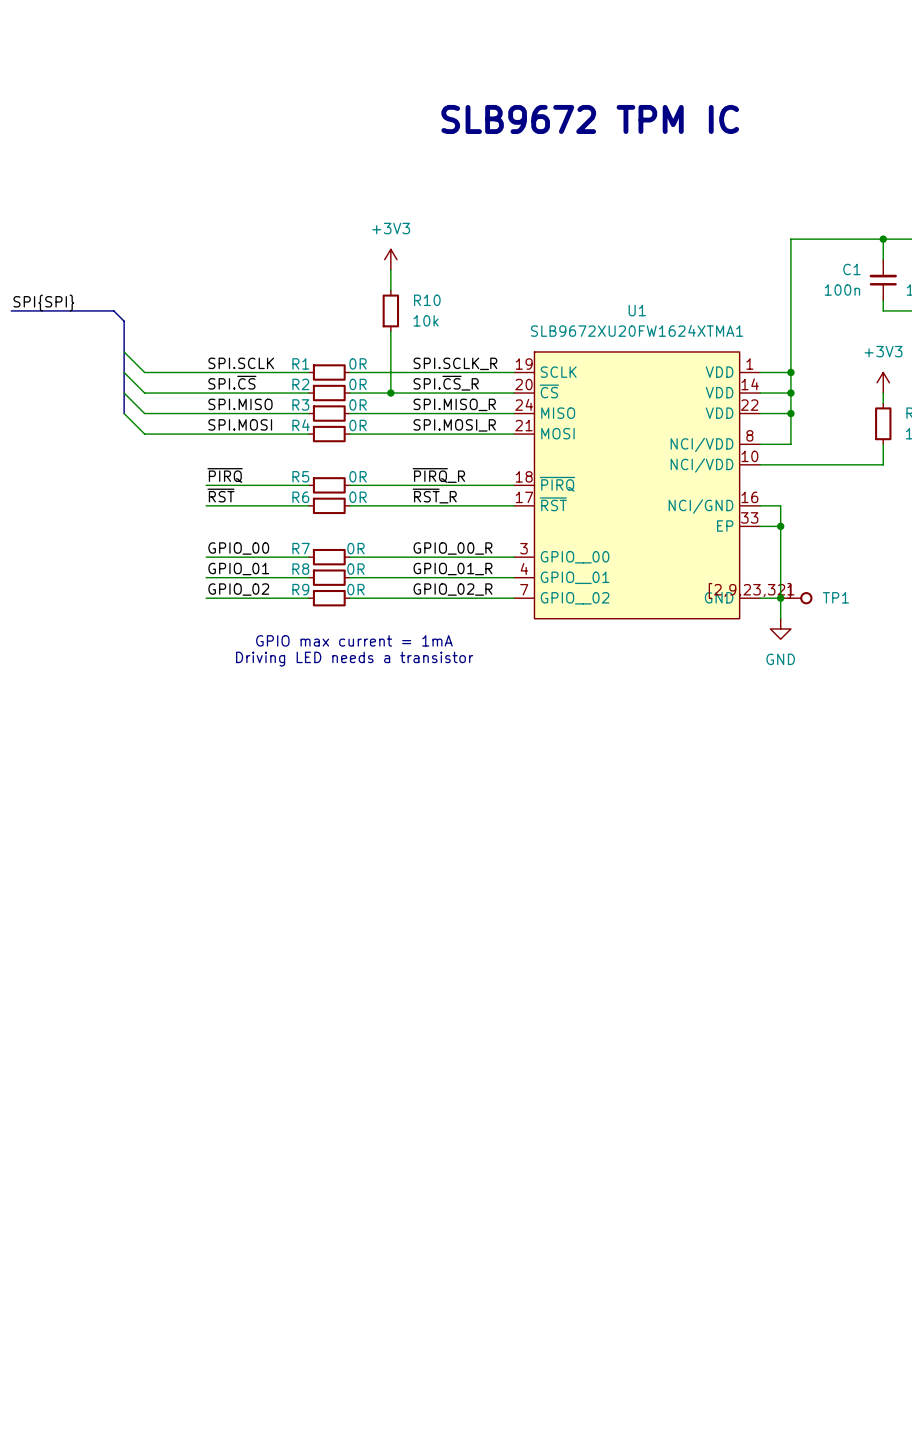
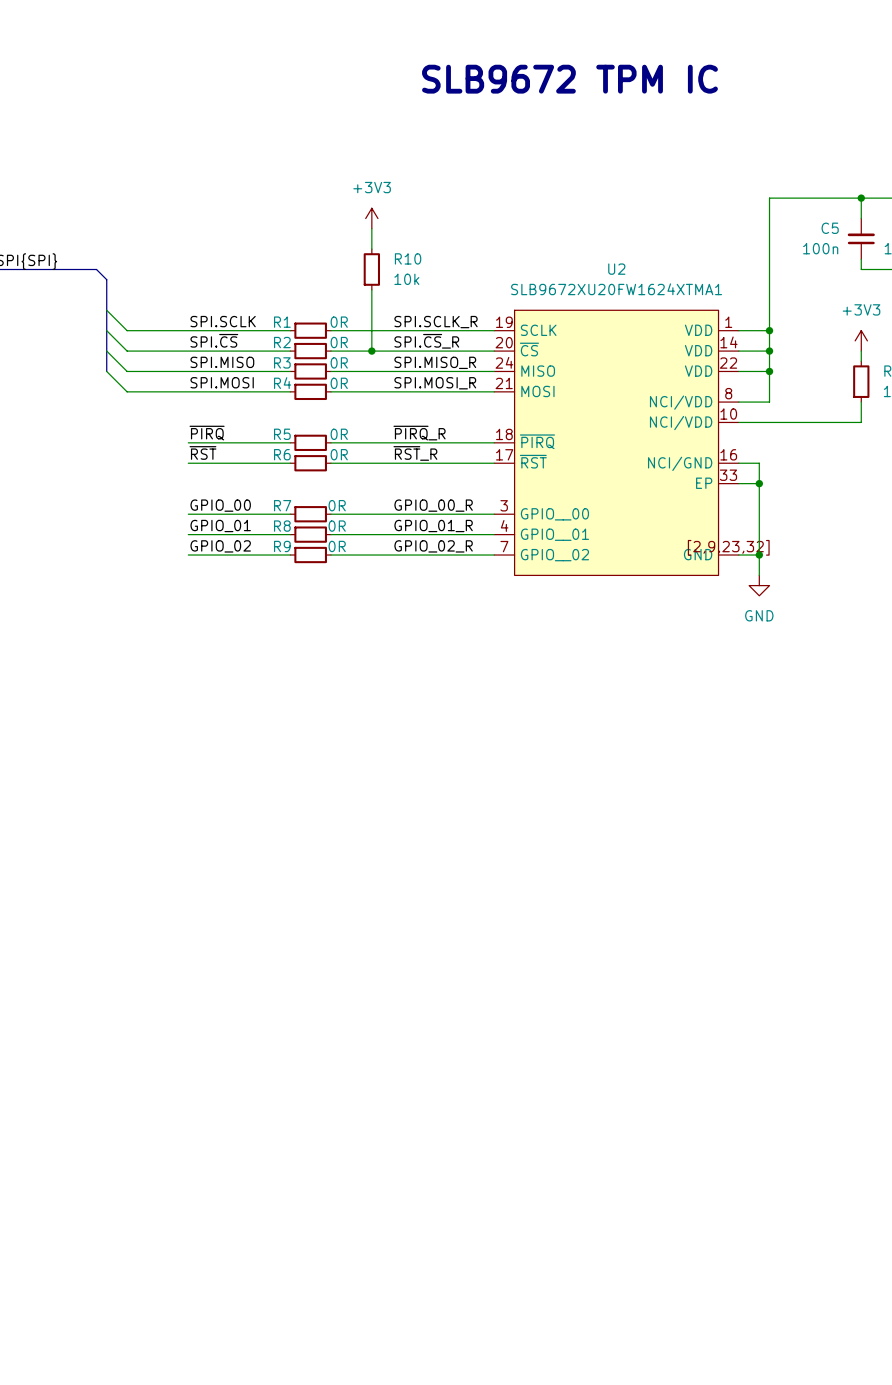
C1 name: C1 (851, 269) -> C5 (830, 228)
U1 name: U1 (637, 310) -> U2 (616, 269)
TP1: (796, 598) -> none
text: GPIO max current = 1mA (354, 640) -> none
text: Driving LED needs a transistor (354, 659) -> none

